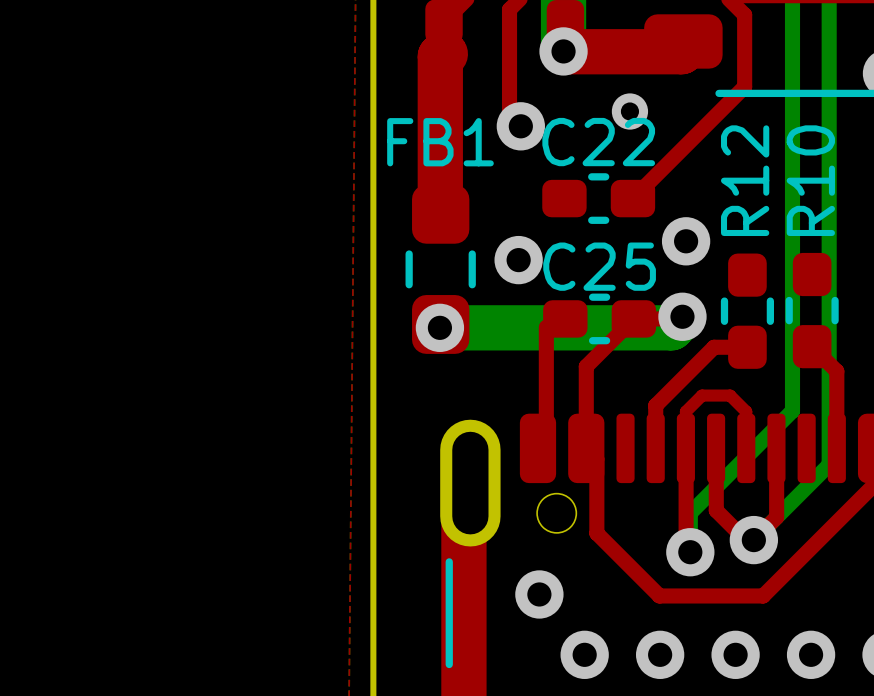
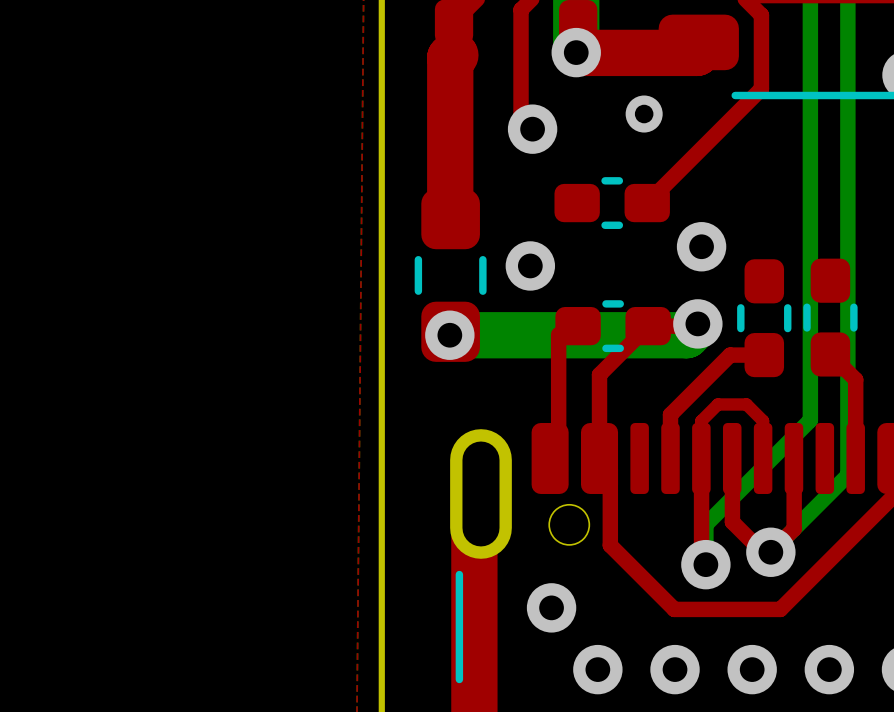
FB1 name: FB1 (440, 142) -> none
C22 name: C22 (598, 142) -> none
R12 name: R12 (745, 180) -> none
R10 name: R10 (810, 180) -> none
C25 name: C25 (599, 266) -> none

